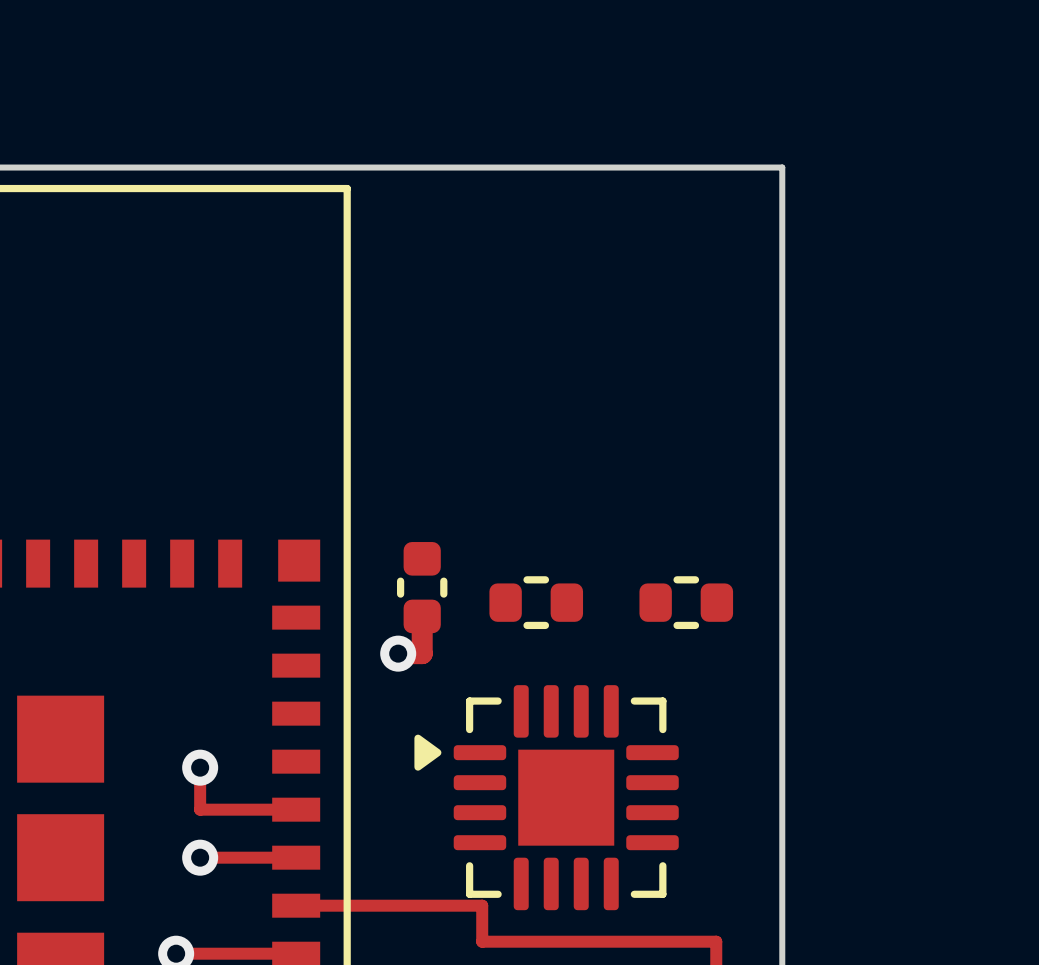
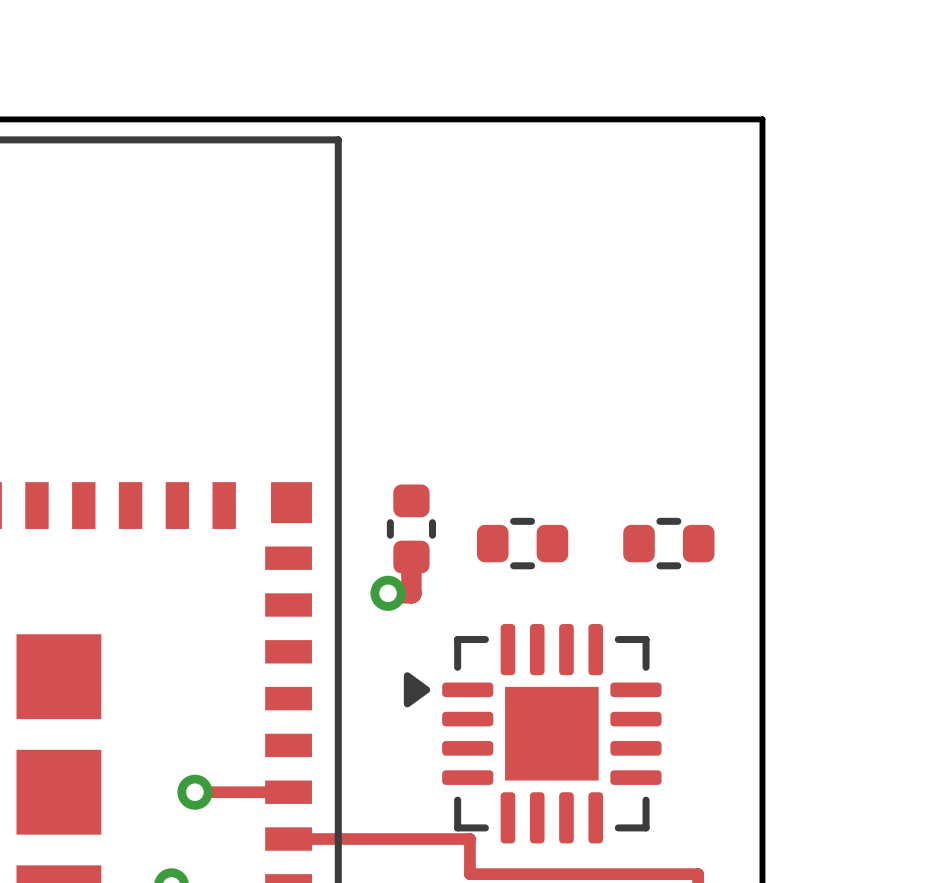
track: (200, 767) (200, 809) (296, 809) -> none
via: (200, 767) -> none

